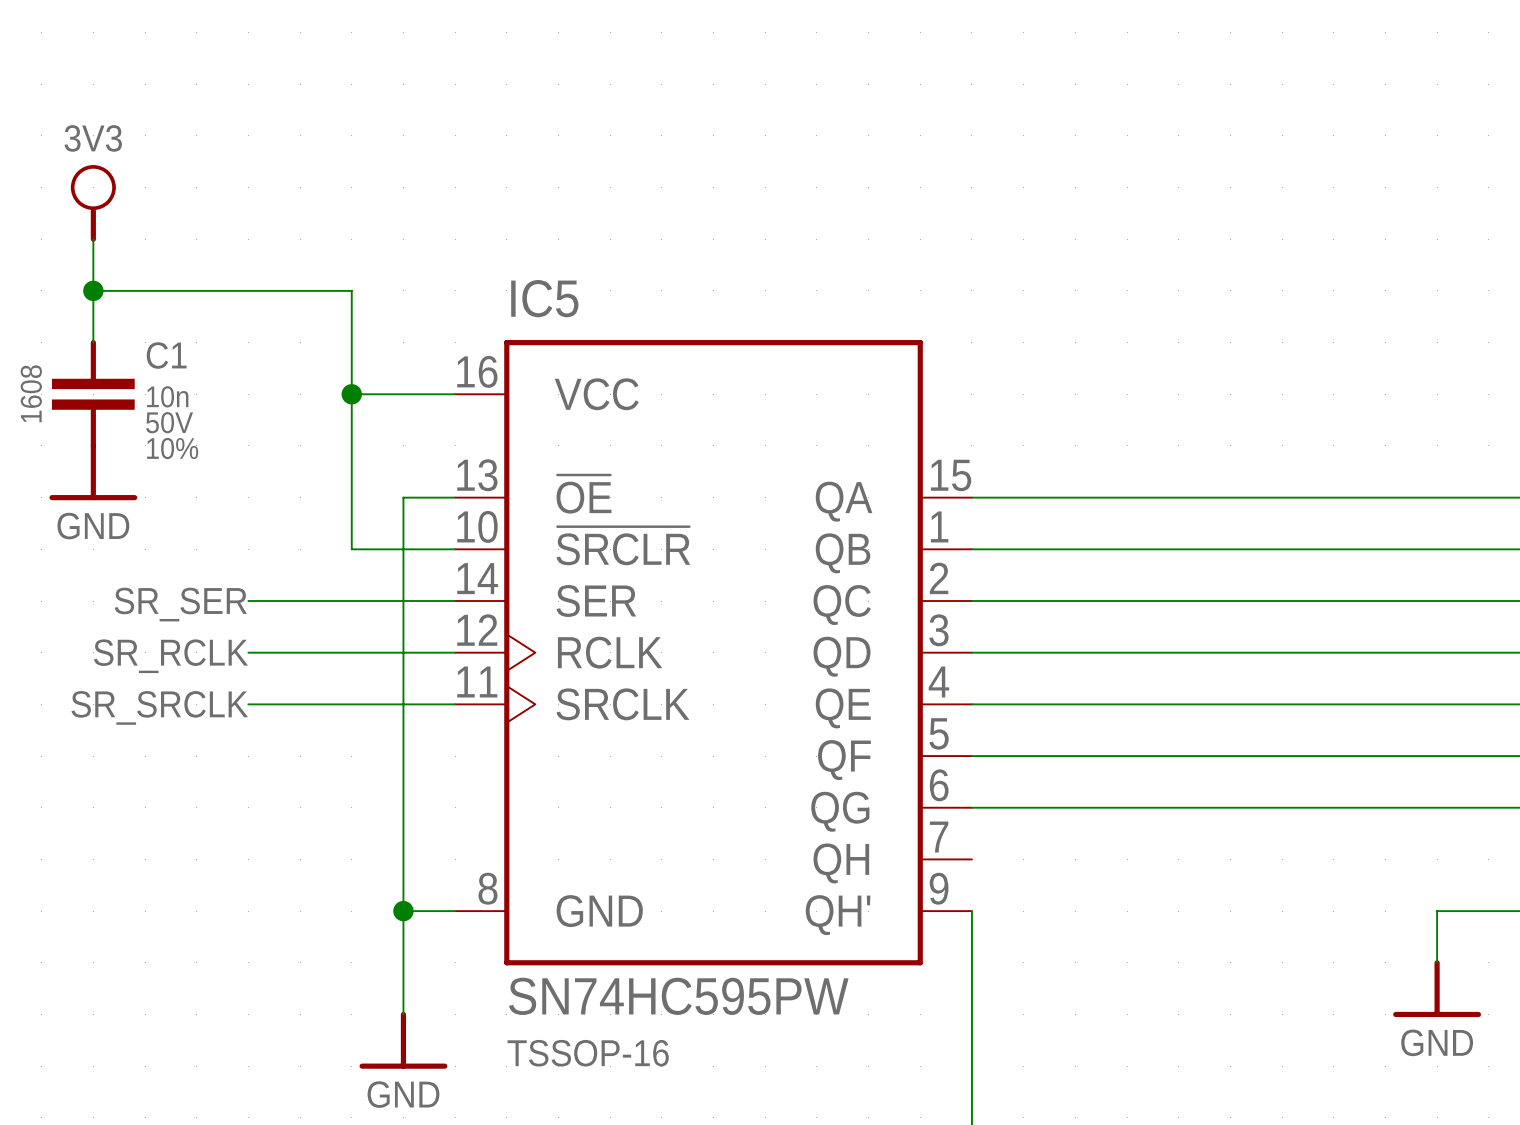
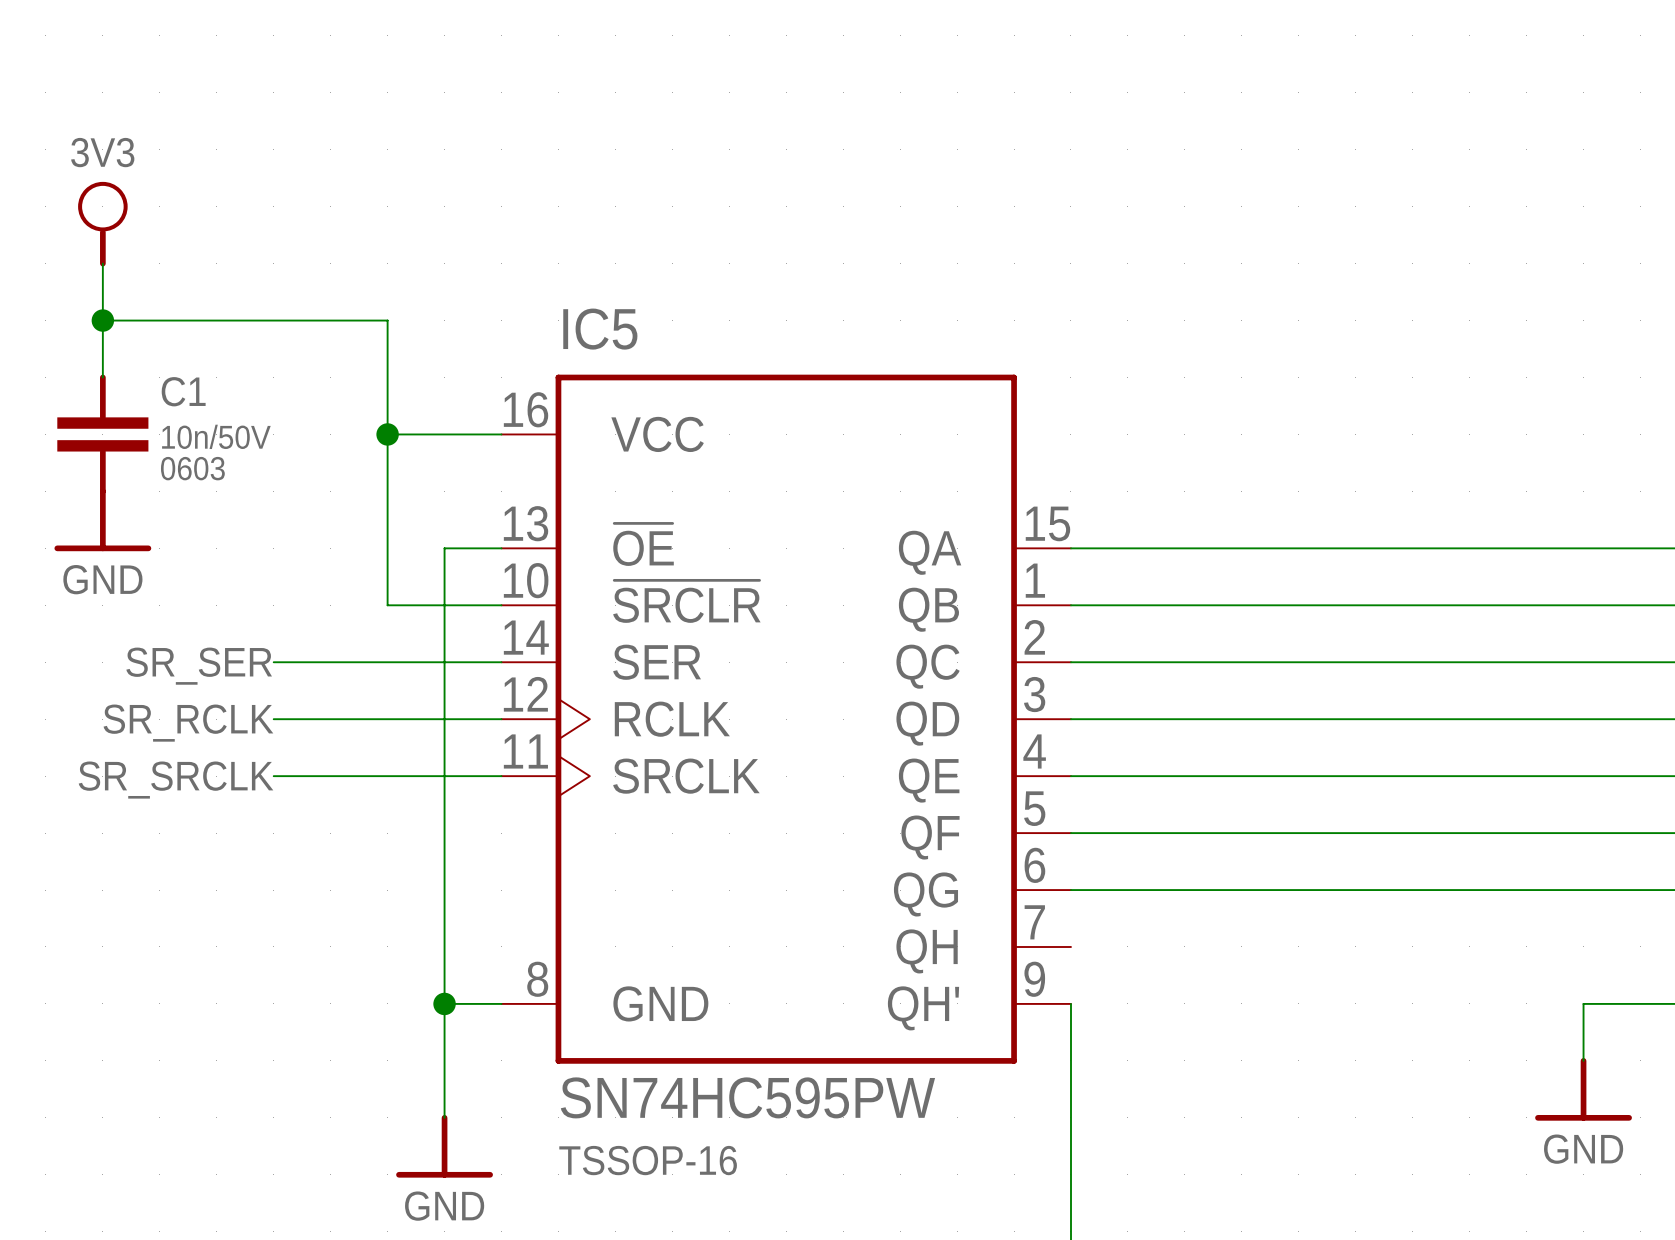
C1 text: 1608 (31, 393) -> none
C1 value: 10n (167, 396) -> 10n/50V (216, 436)
C1 text: 50V (169, 422) -> none
C1 text: none -> 0603 (192, 468)
C1 text: 10% (172, 448) -> none

